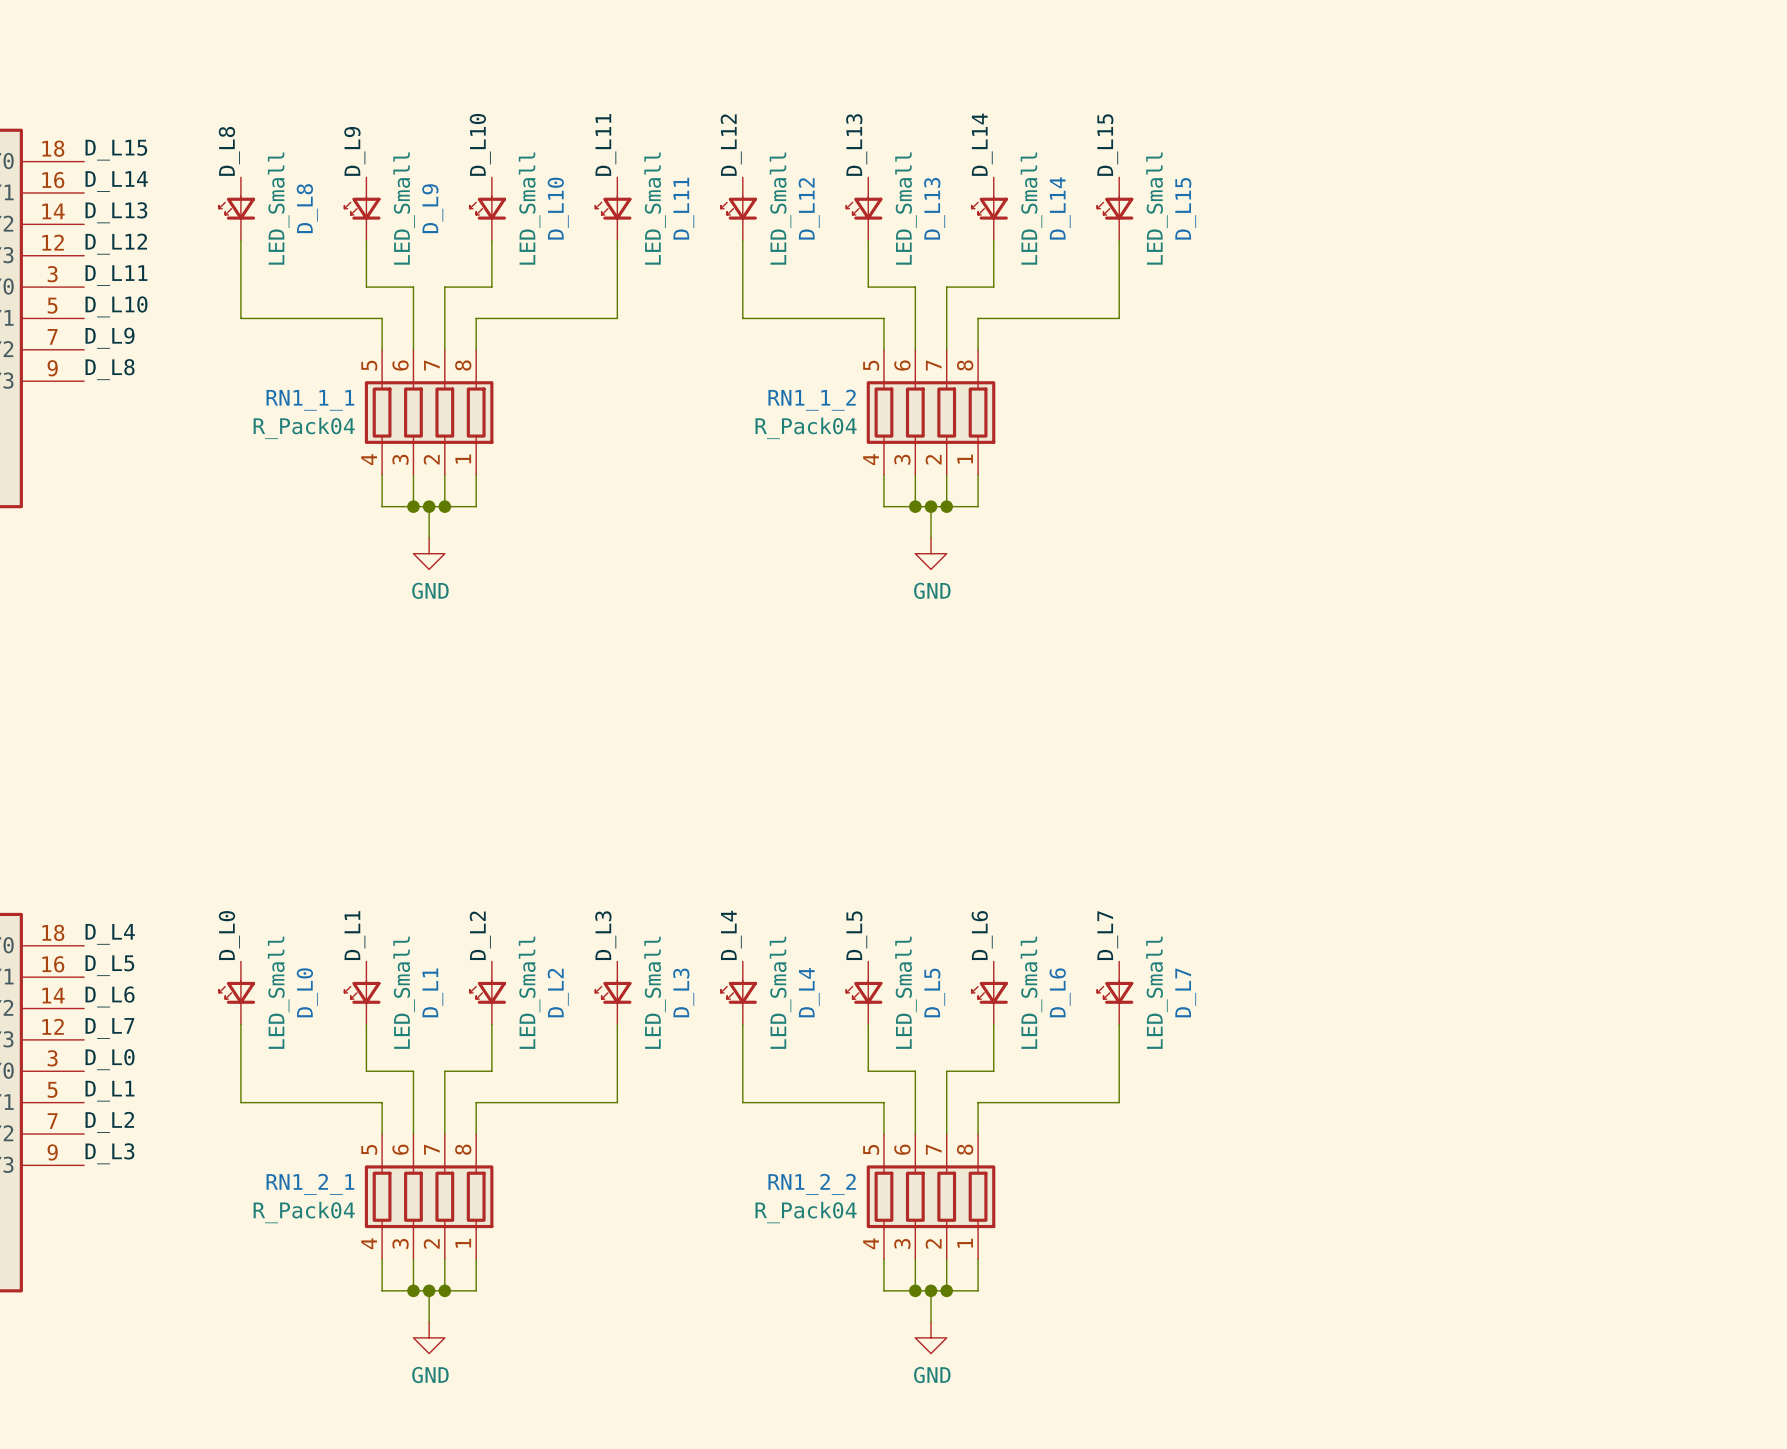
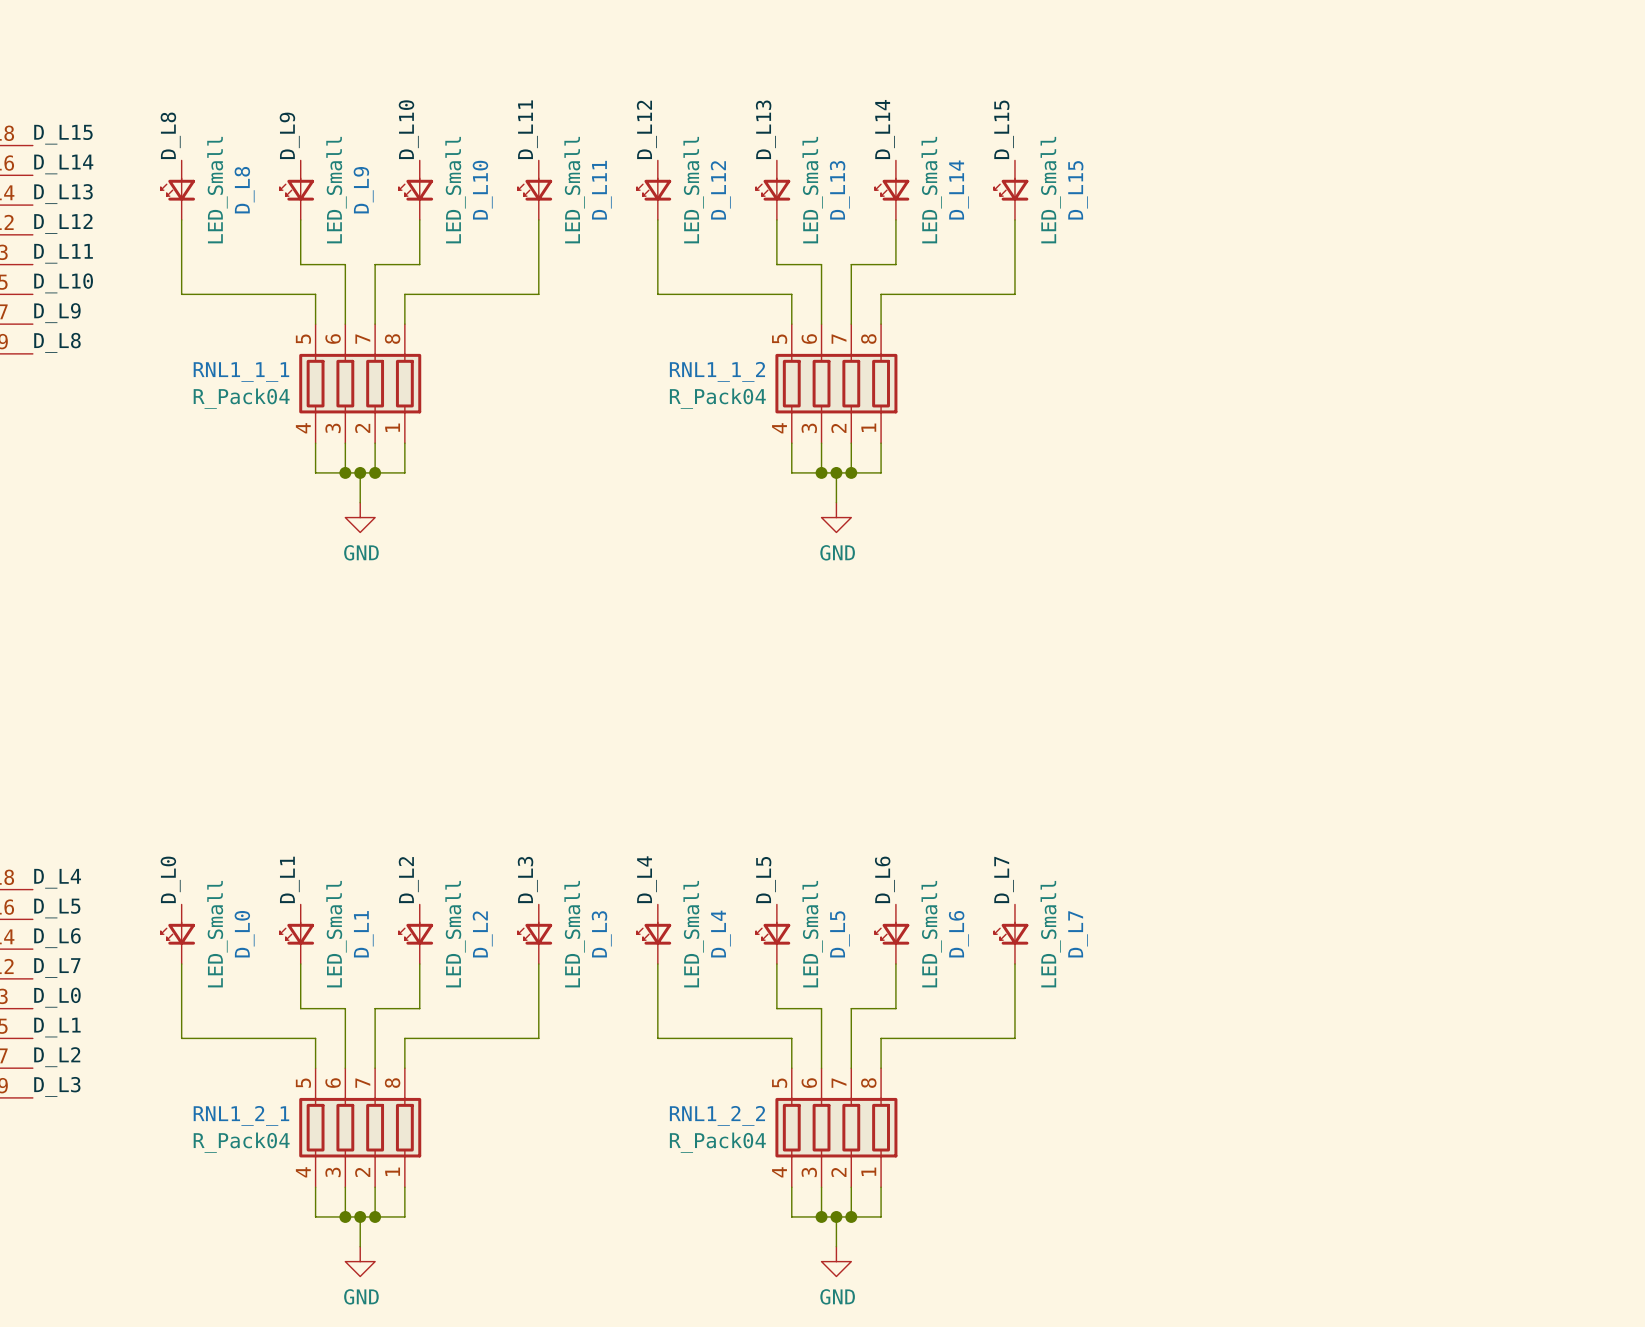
RN1_1_1 name: RN1_1_1 (310, 400) -> RNL1_1_1 (241, 372)
RN1_1_2 name: RN1_1_2 (812, 400) -> RNL1_1_2 (717, 371)
RN1_2_1 name: RN1_2_1 (310, 1184) -> RNL1_2_1 (241, 1115)
RN1_2_2 name: RN1_2_2 (812, 1184) -> RNL1_2_2 (717, 1115)

